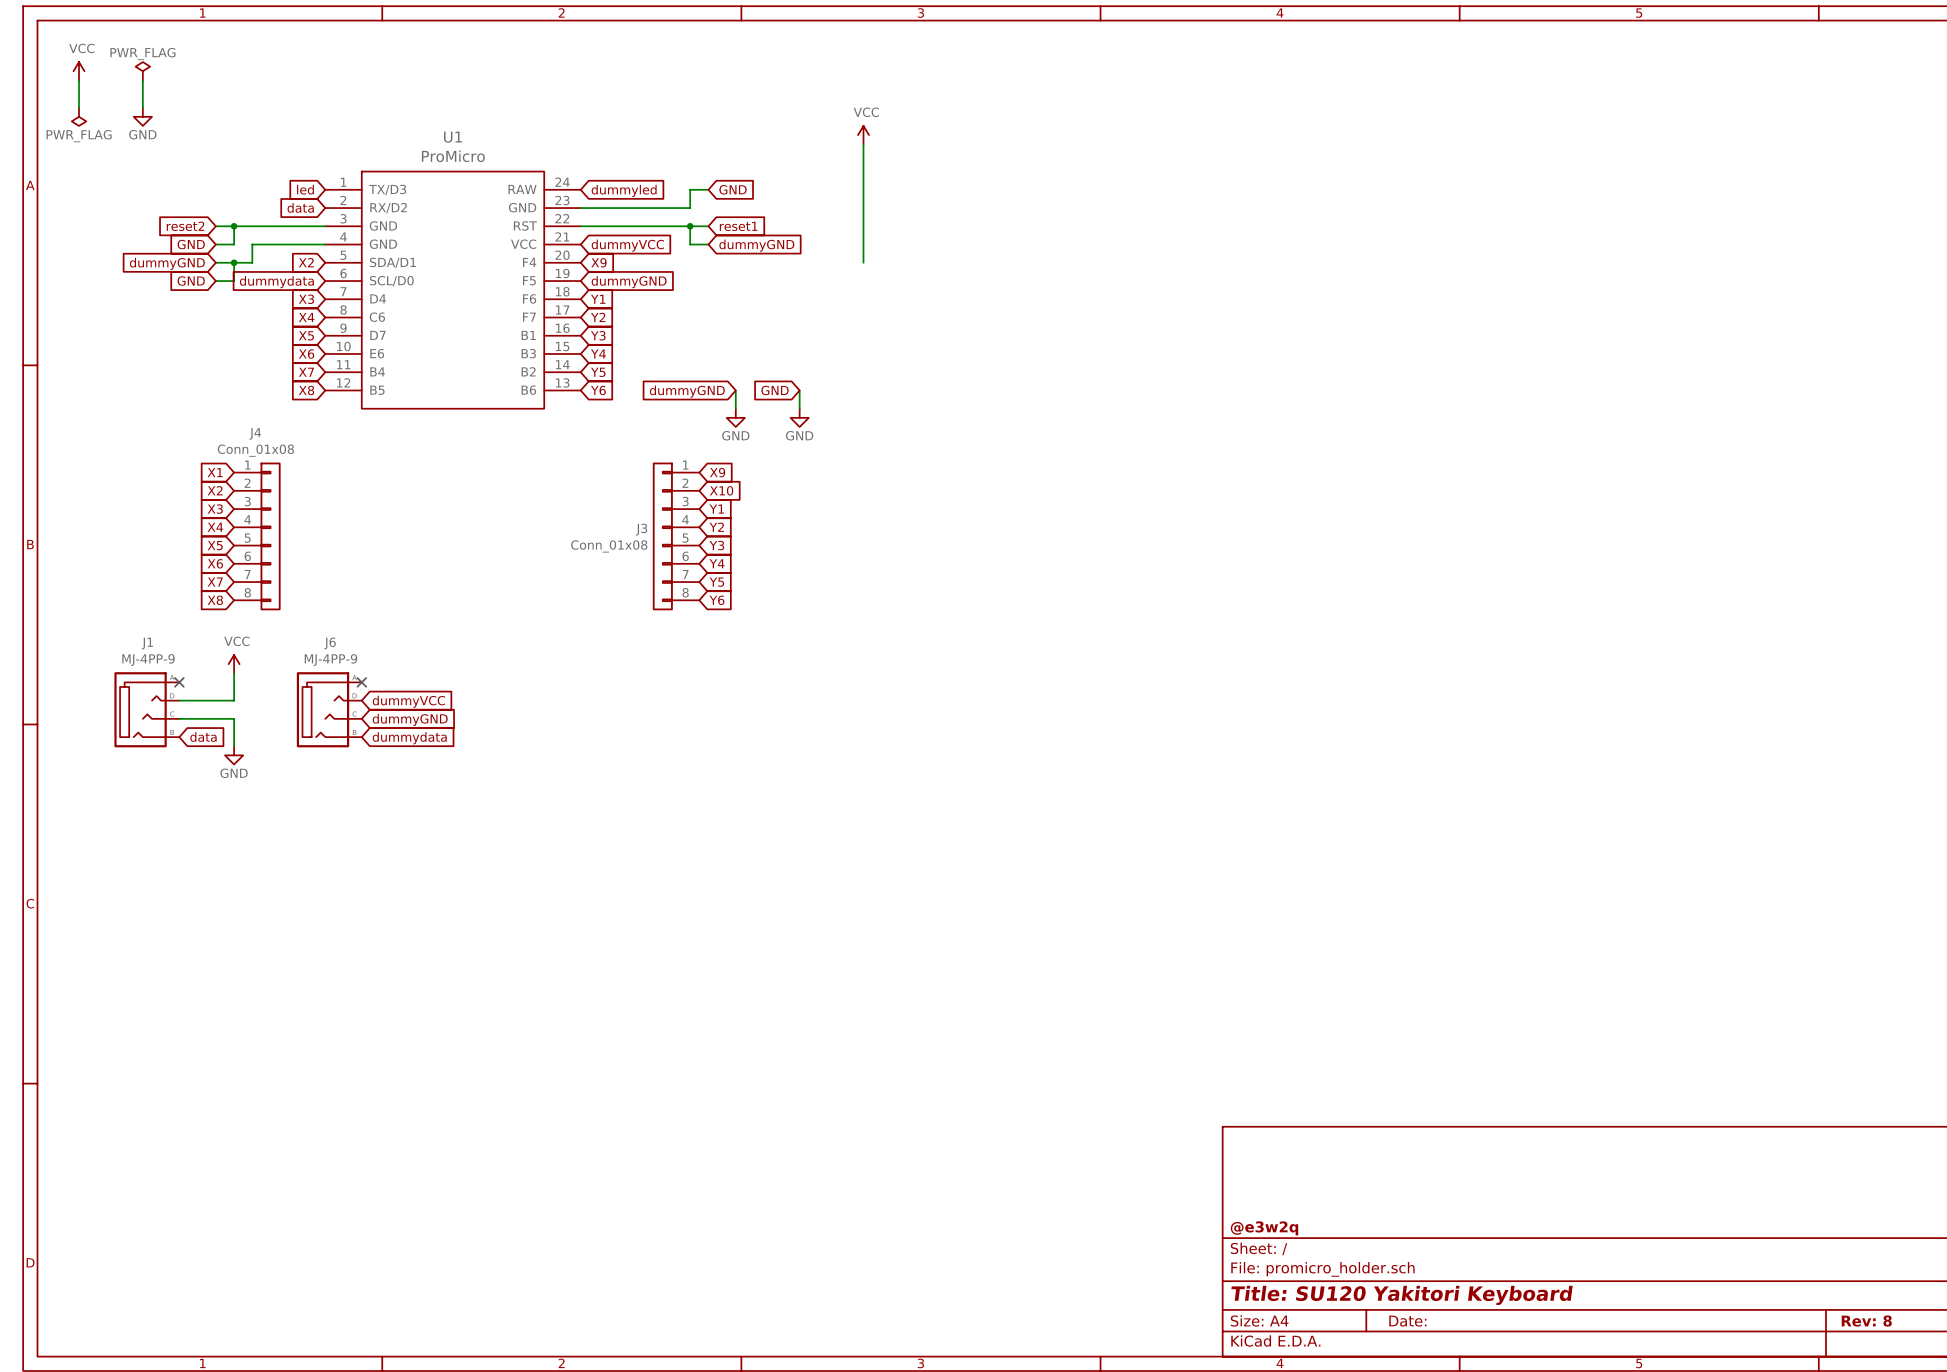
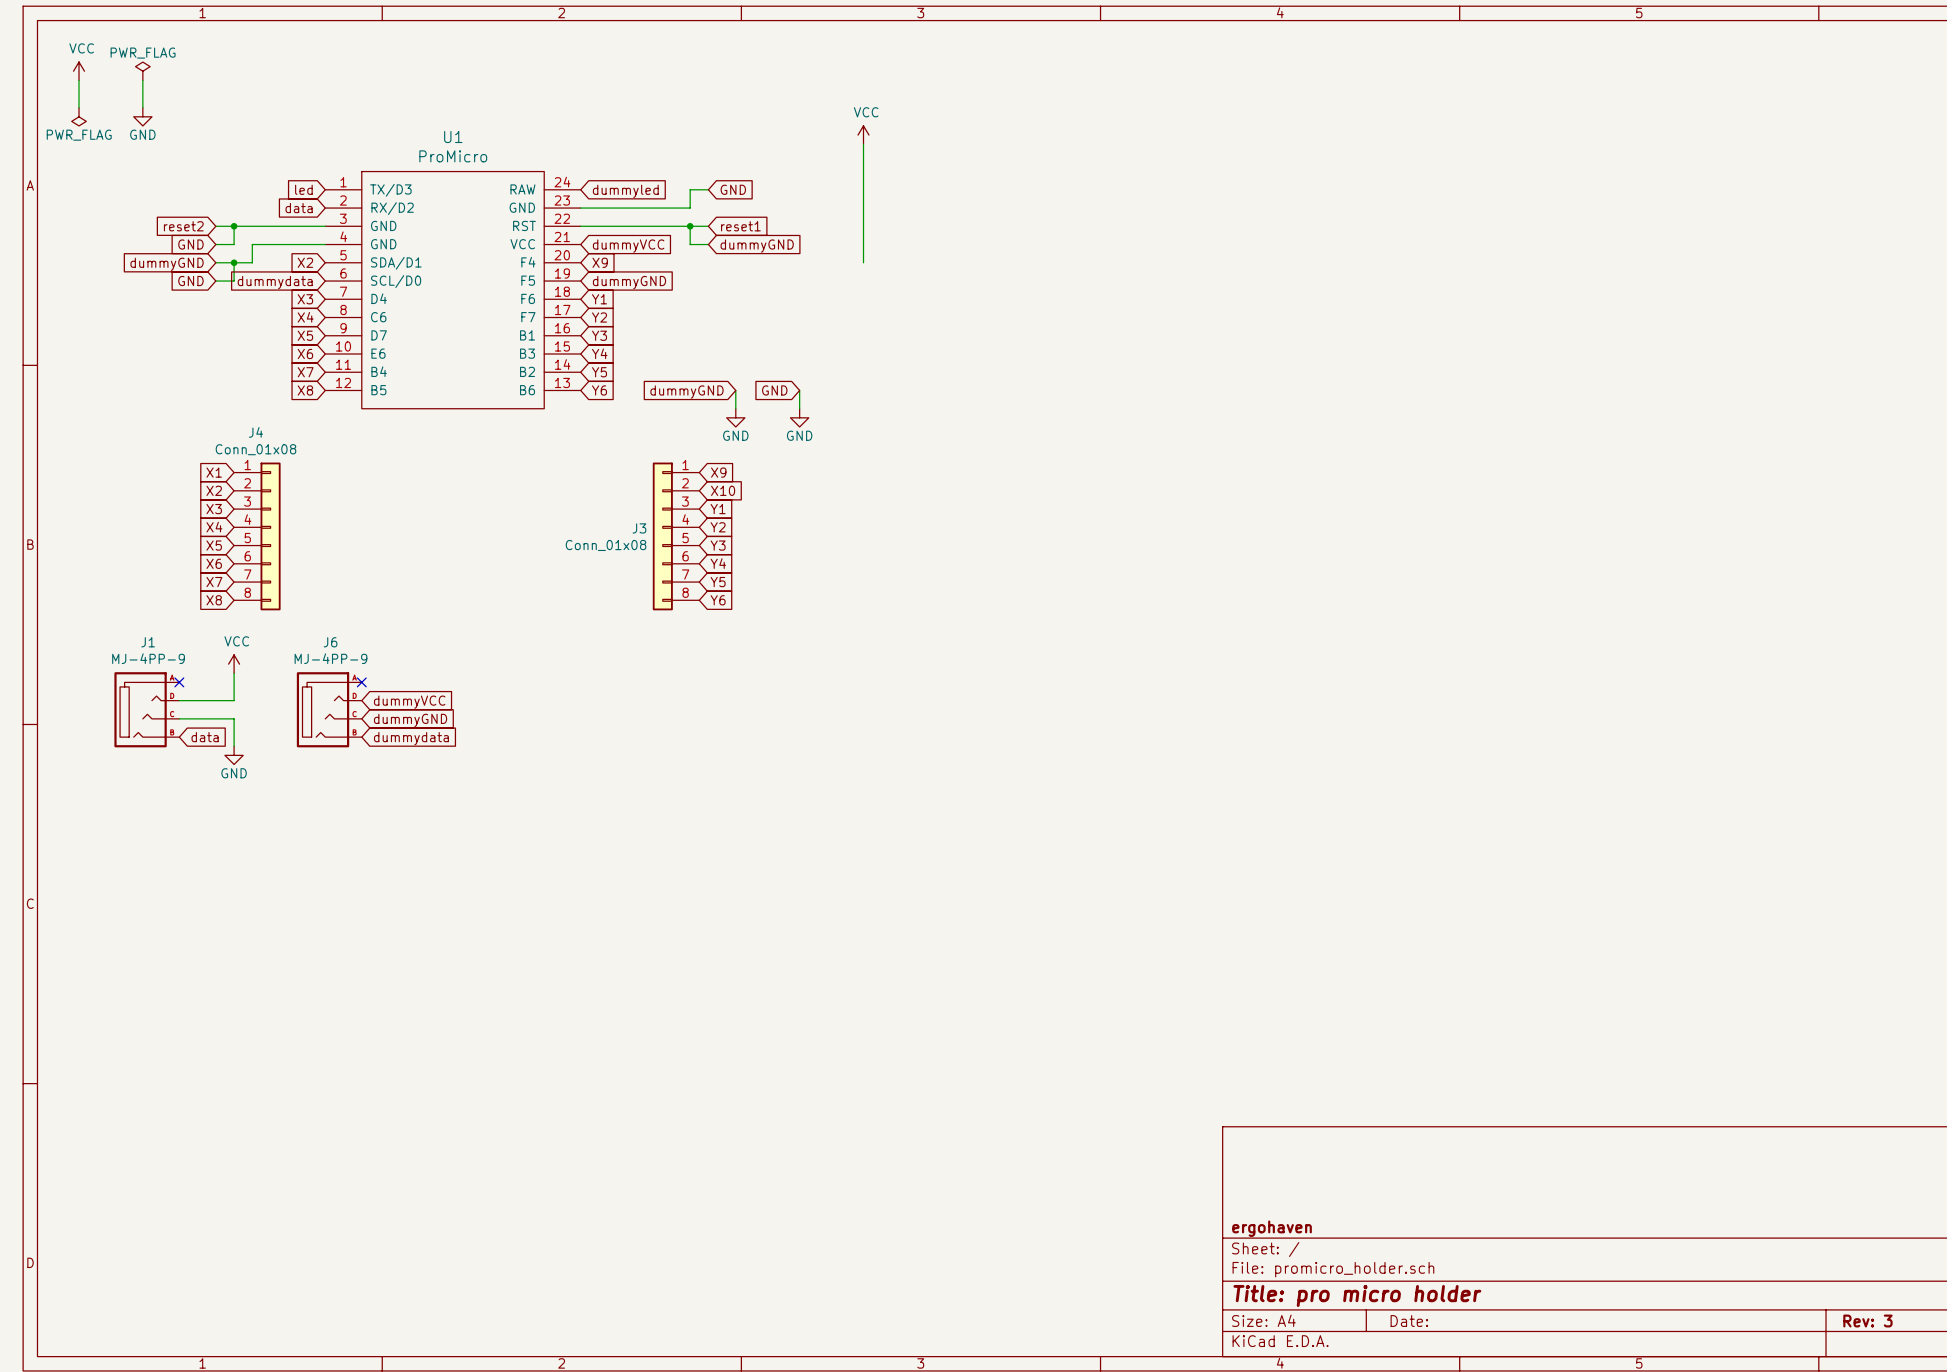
title block: @e3w2q (1264, 1228) -> ergohaven (1272, 1228)
title block: Title: SU120 Yakitori Keyboard (1402, 1295) -> Title: pro micro holder (1357, 1295)
title block: Rev: 8 (1866, 1321) -> Rev: 3 (1867, 1321)

